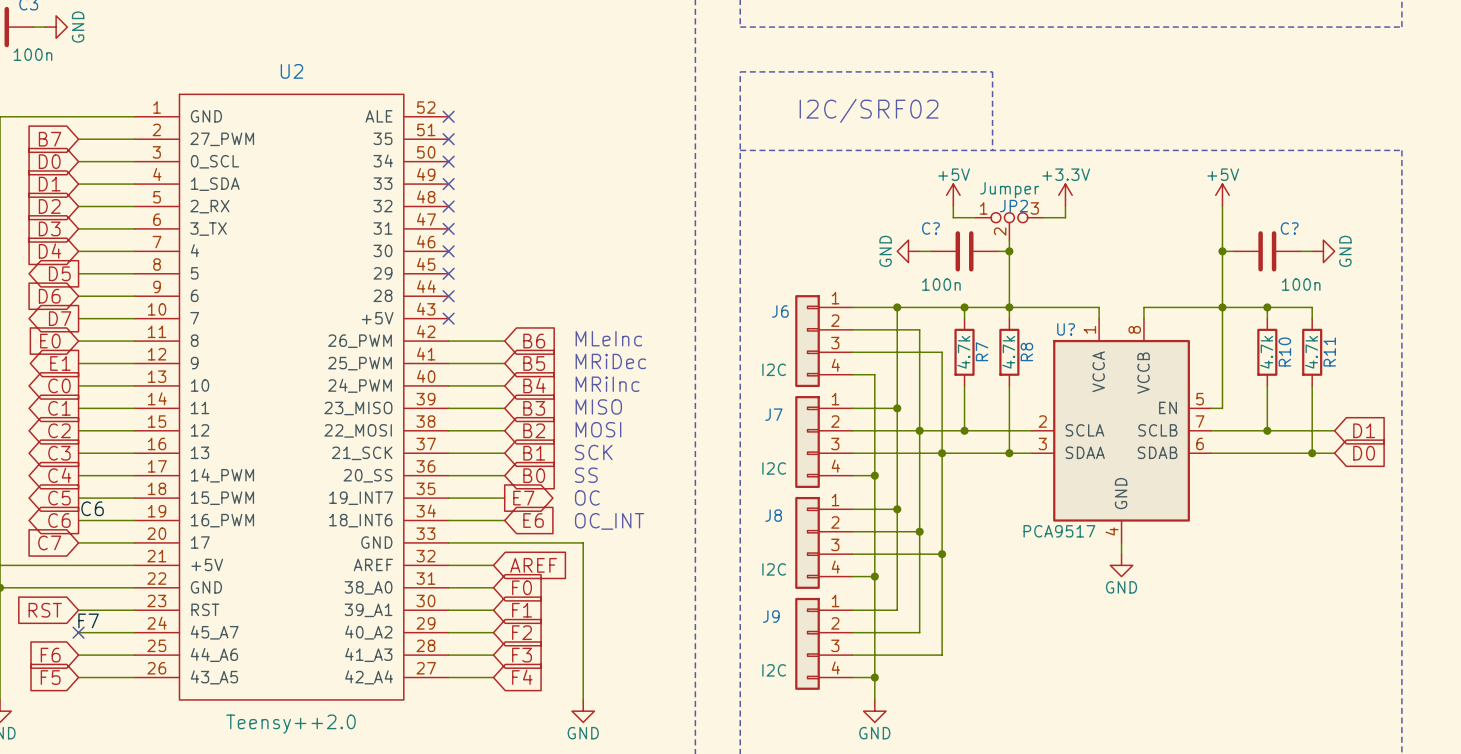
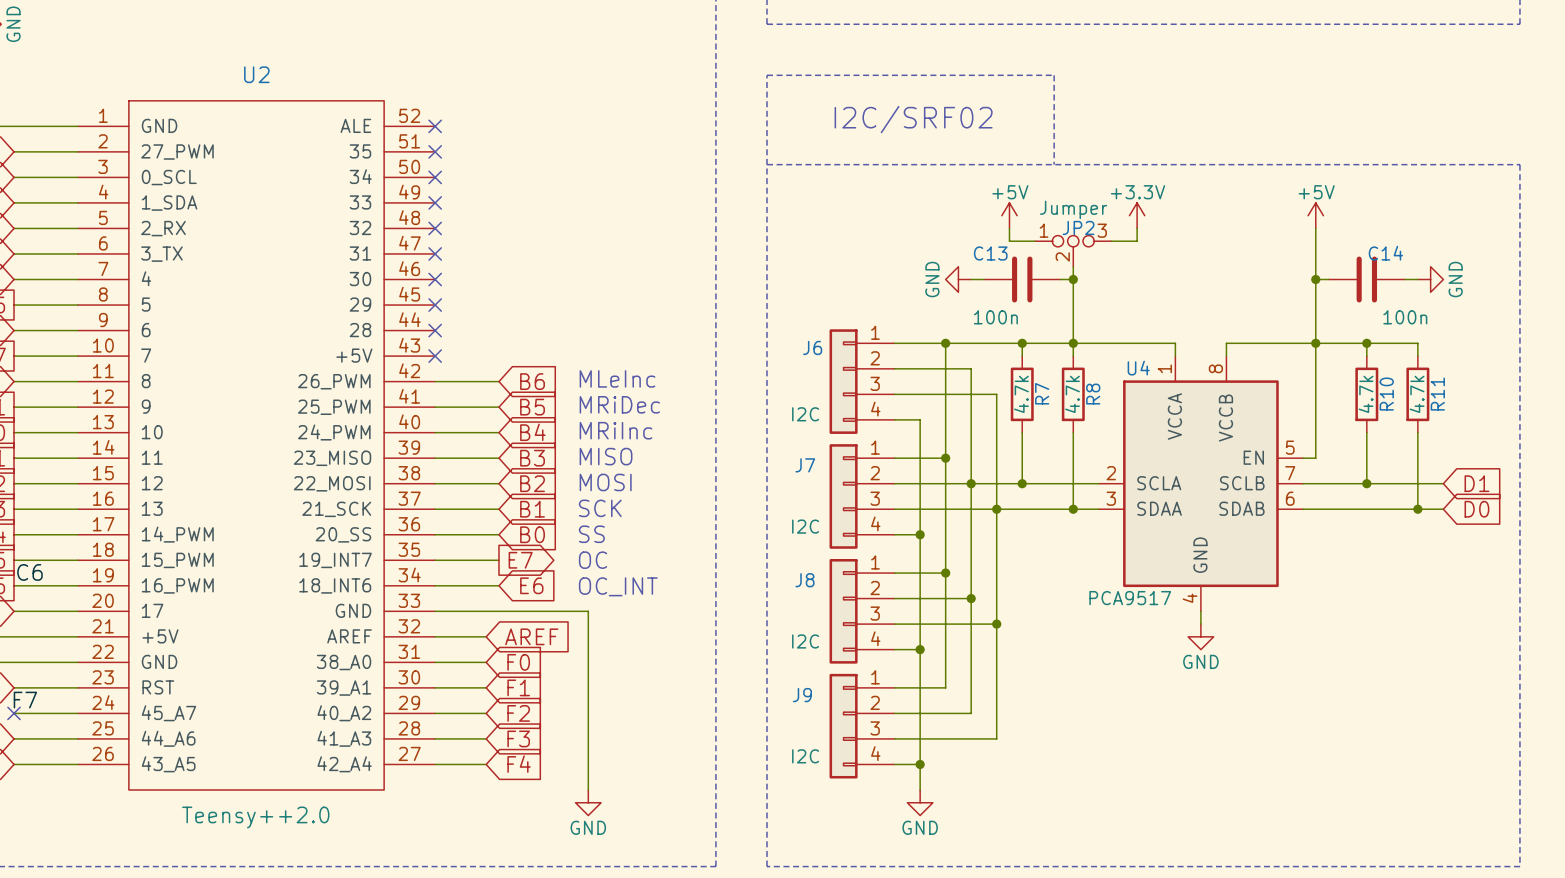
C? name: C? (930, 228) -> C13 (990, 253)
C? name: C? (1289, 228) -> C14 (1385, 253)
U? name: U? (1066, 329) -> U4 (1138, 368)

